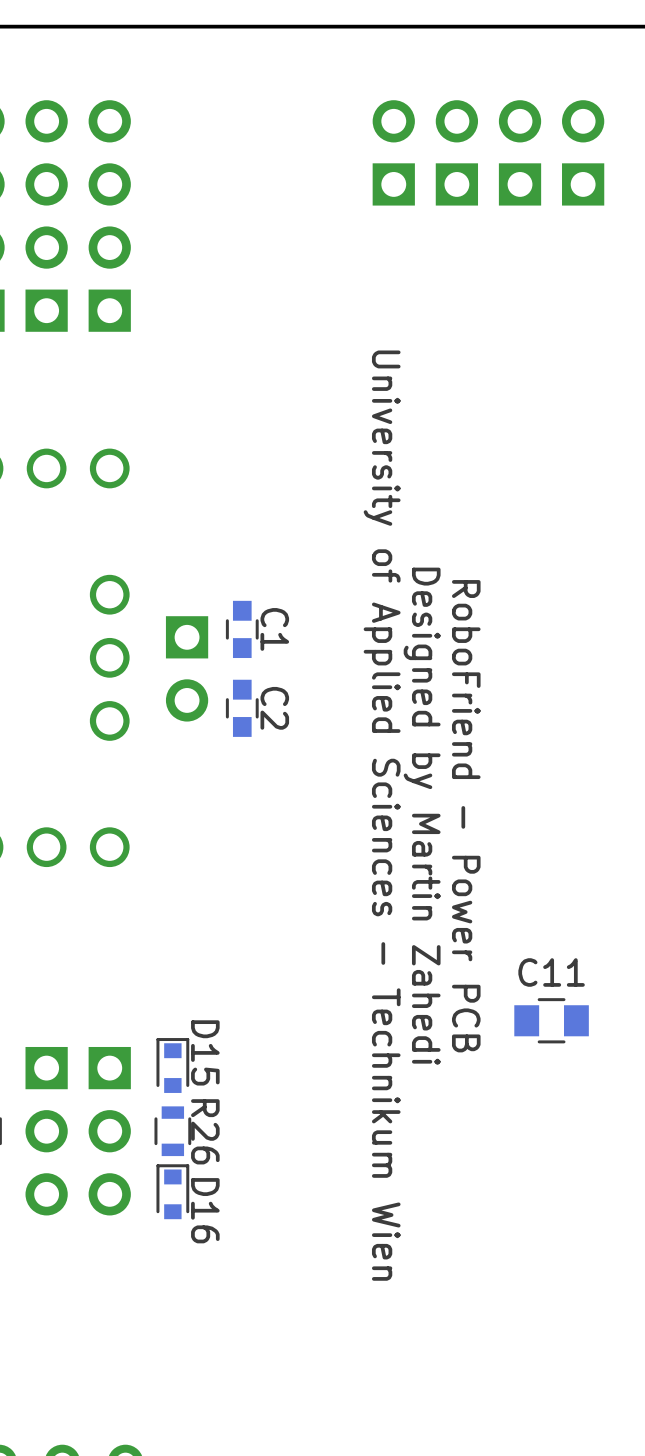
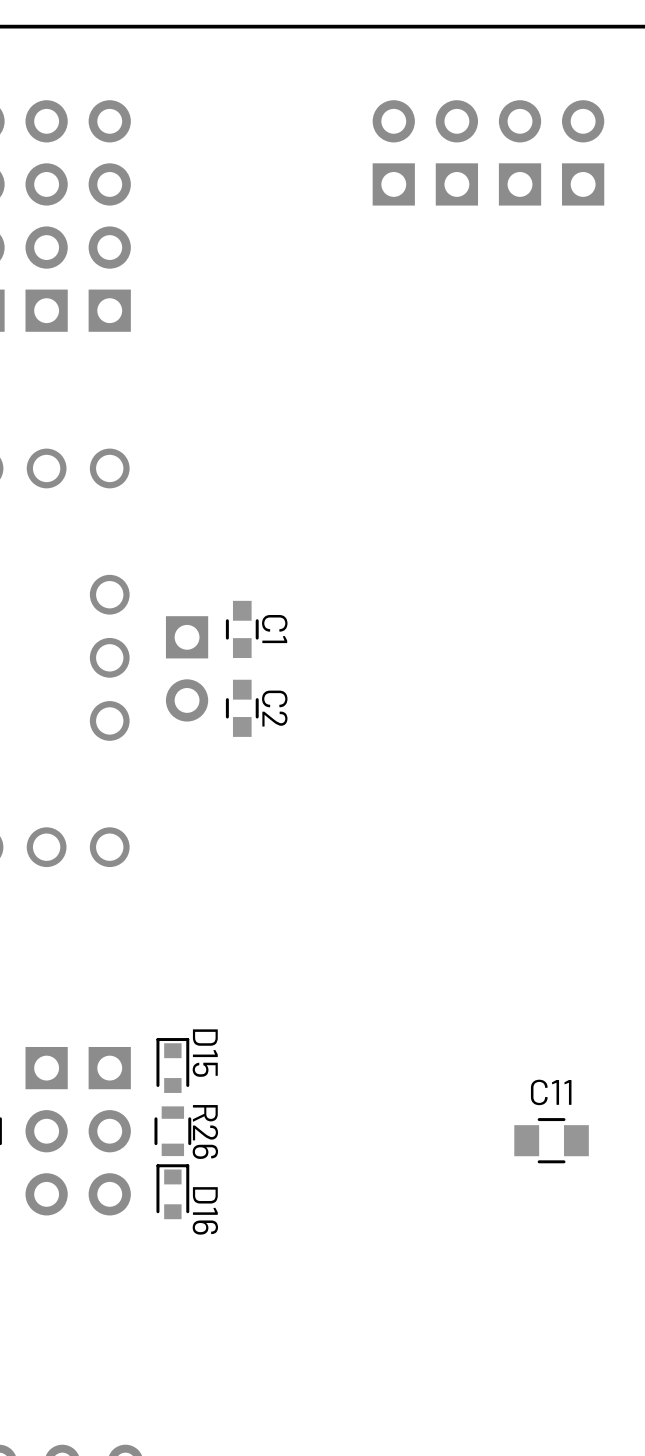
text: University of Applied Sciences - Technikum Wien (382, 815) -> none
text: Designed by Martin Zahedi (422, 816) -> none
text: RoboFriend - Power PCB (466, 816) -> none
C11 position: (551, 1020) -> (551, 1140)

